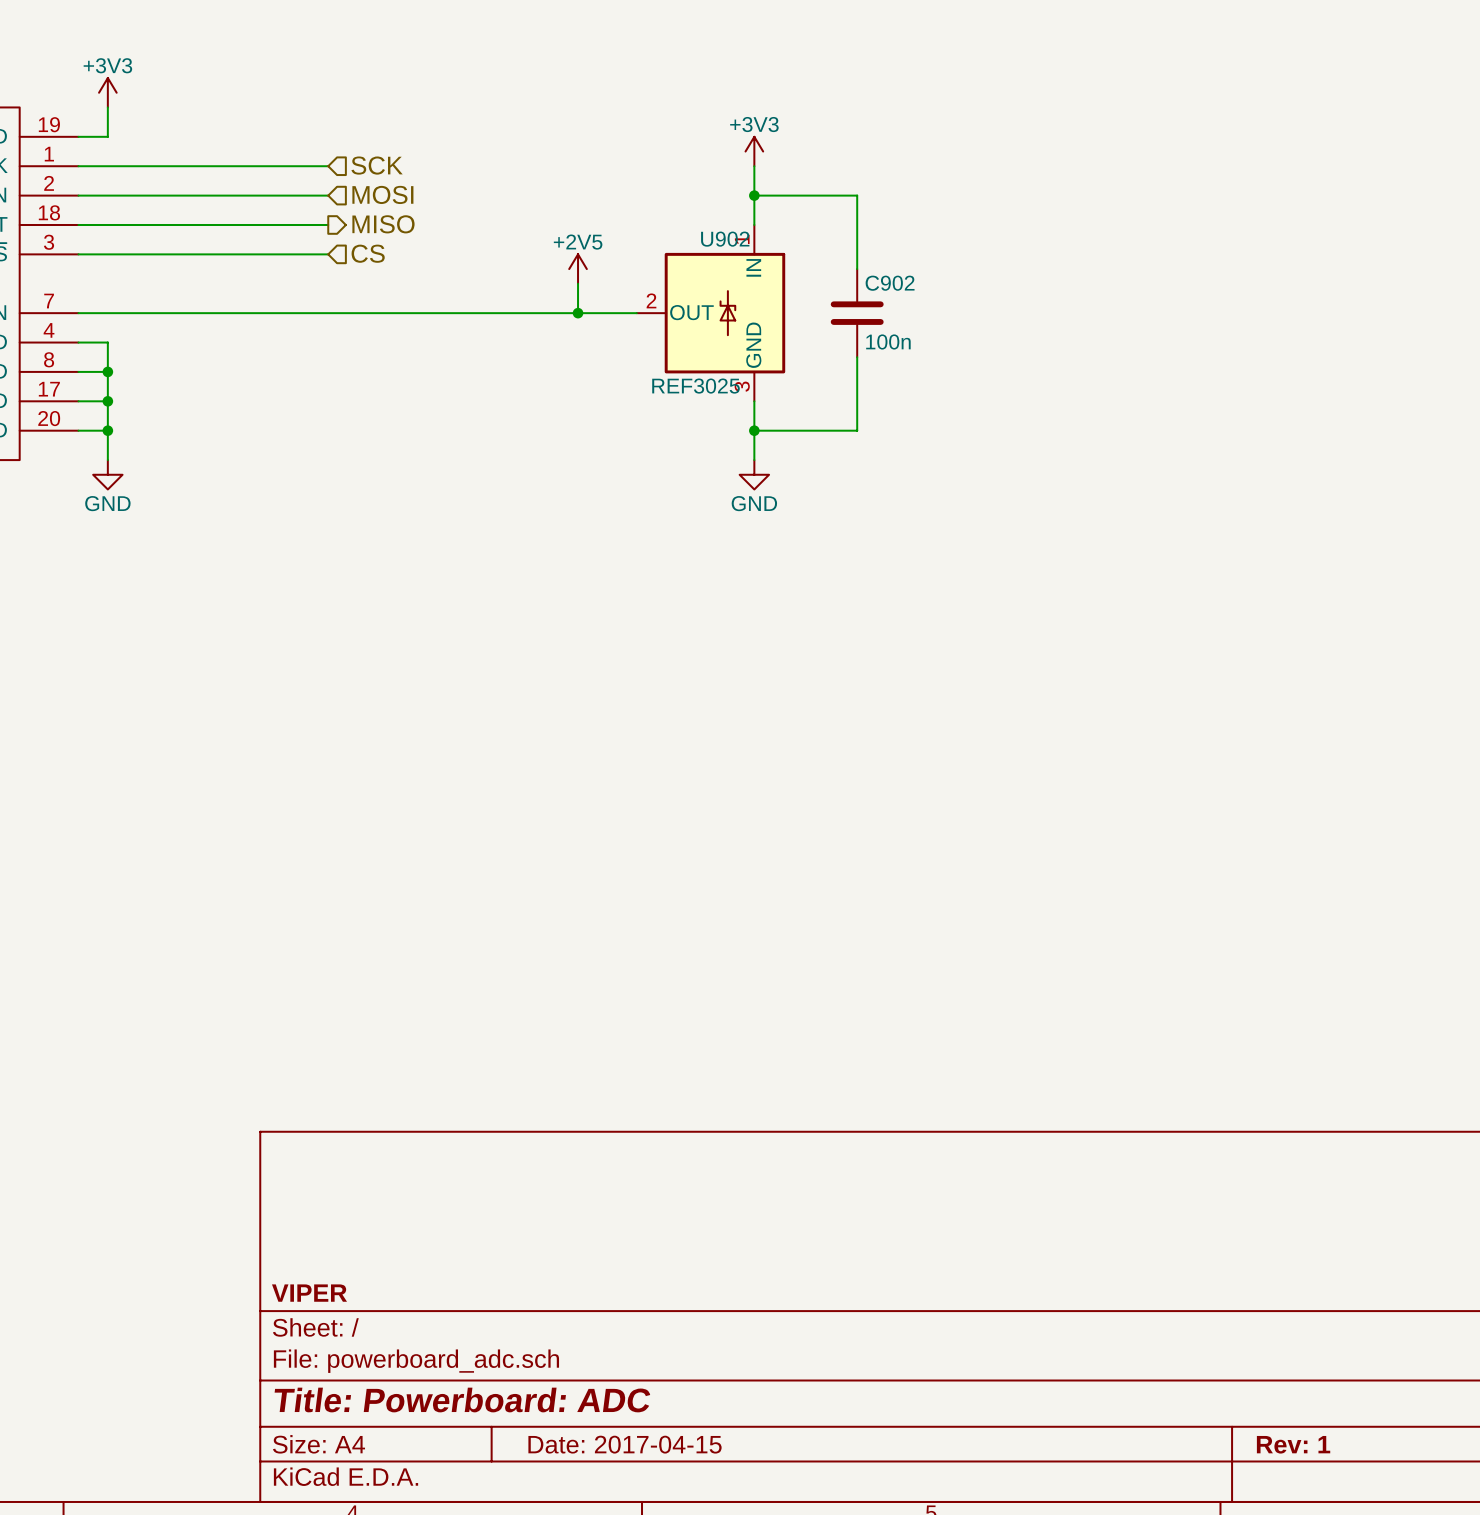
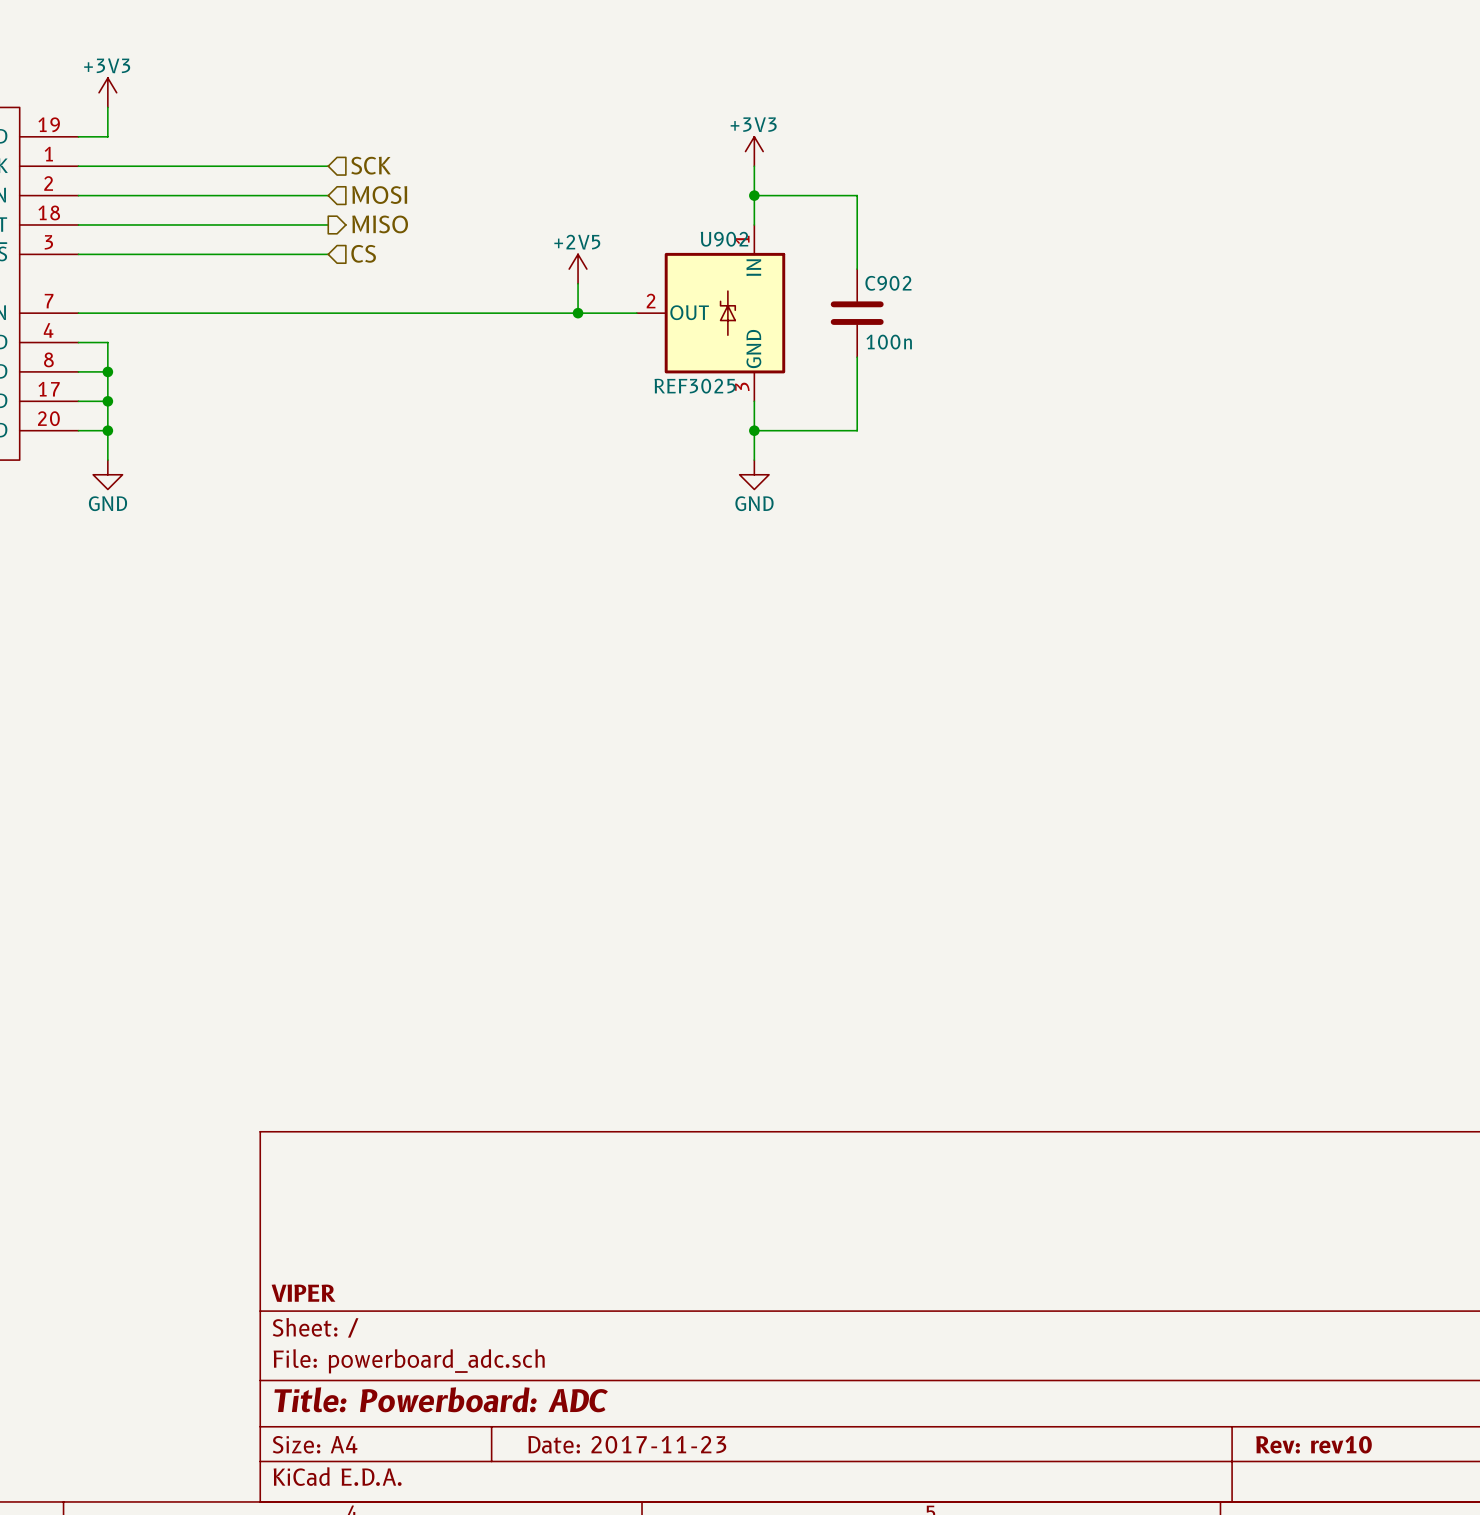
title block: Date: 2017-04-15 (625, 1444) -> Date: 2017-11-23 (627, 1444)
title block: Rev: 1 (1293, 1444) -> Rev: rev10 (1313, 1444)

